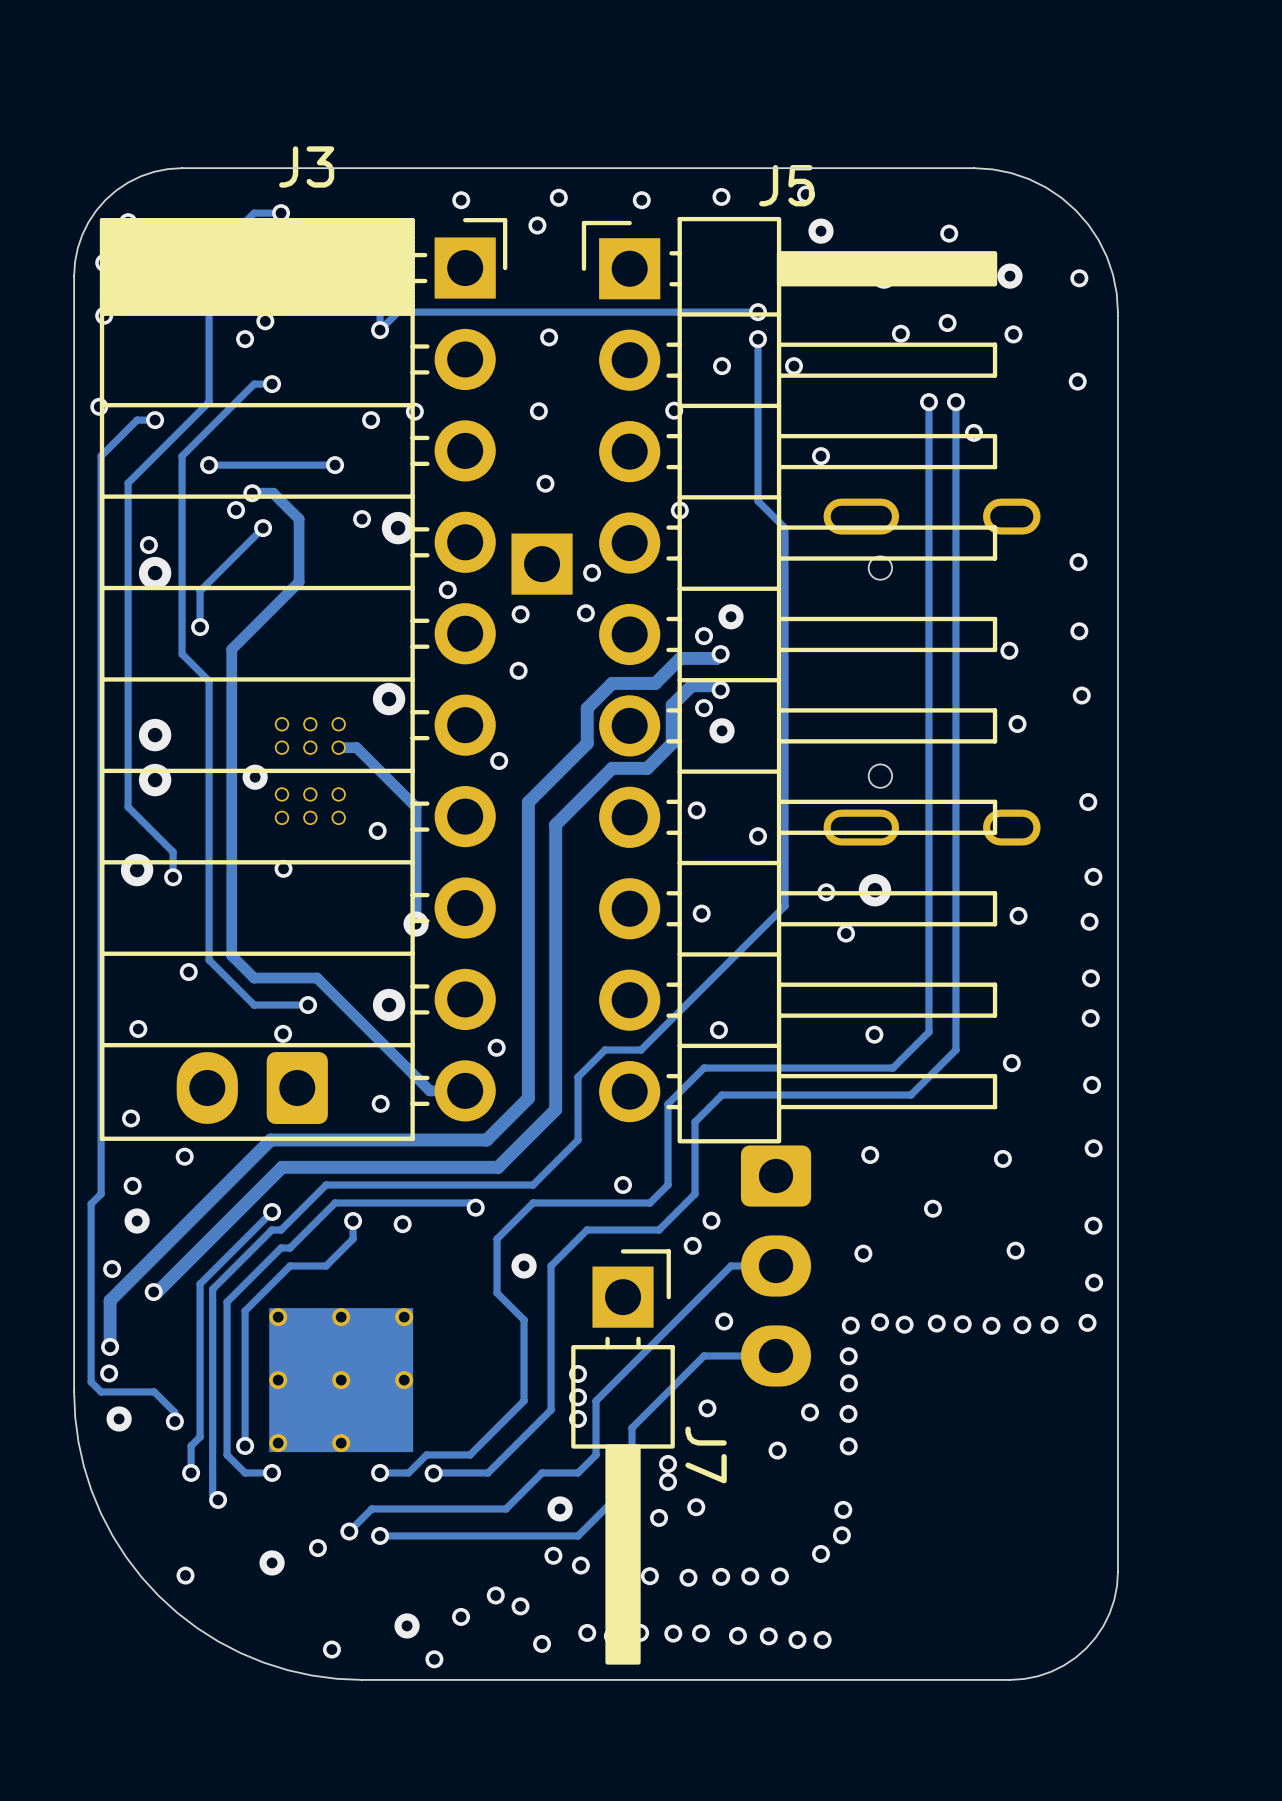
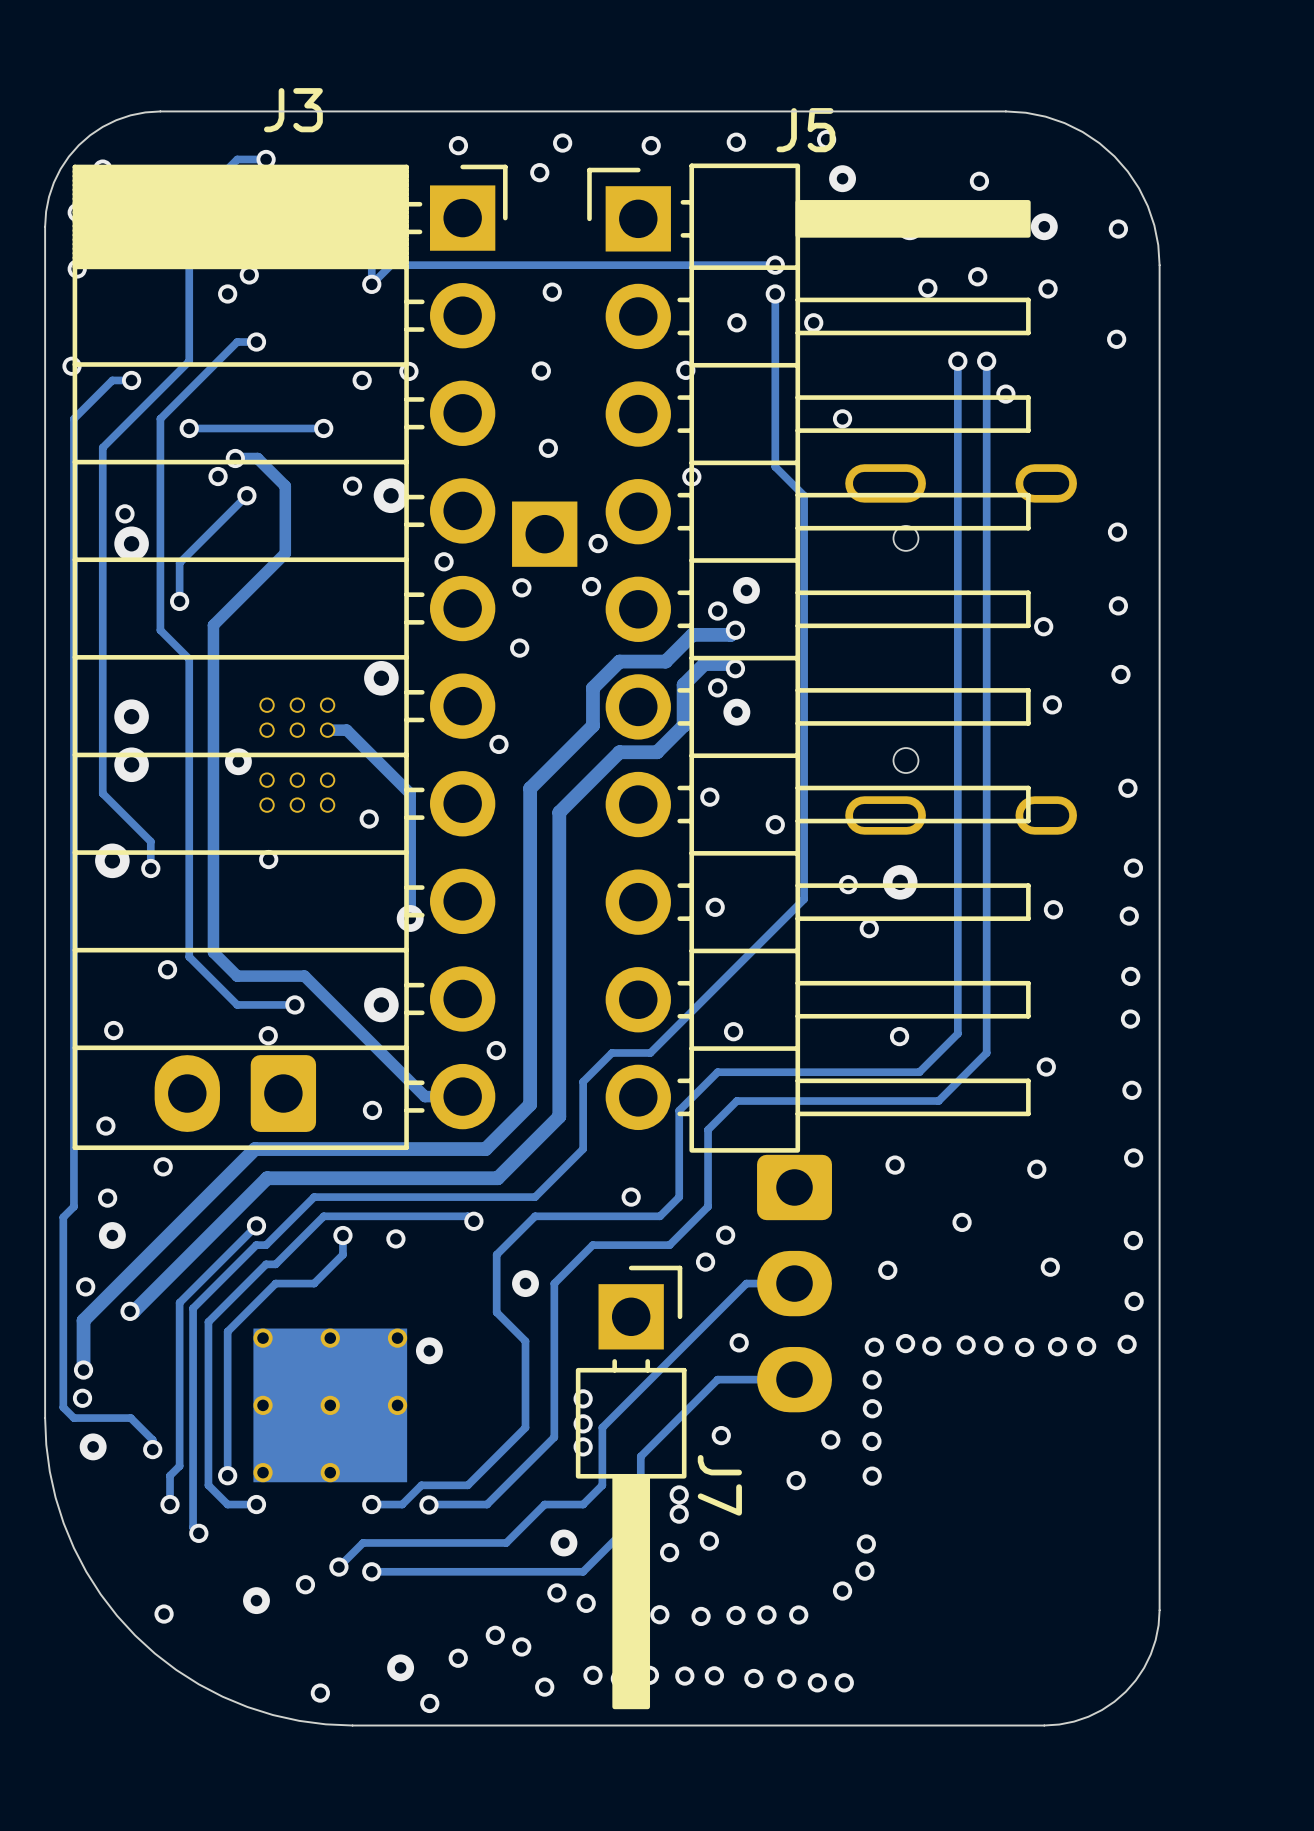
via: none -> (429, 1350)

